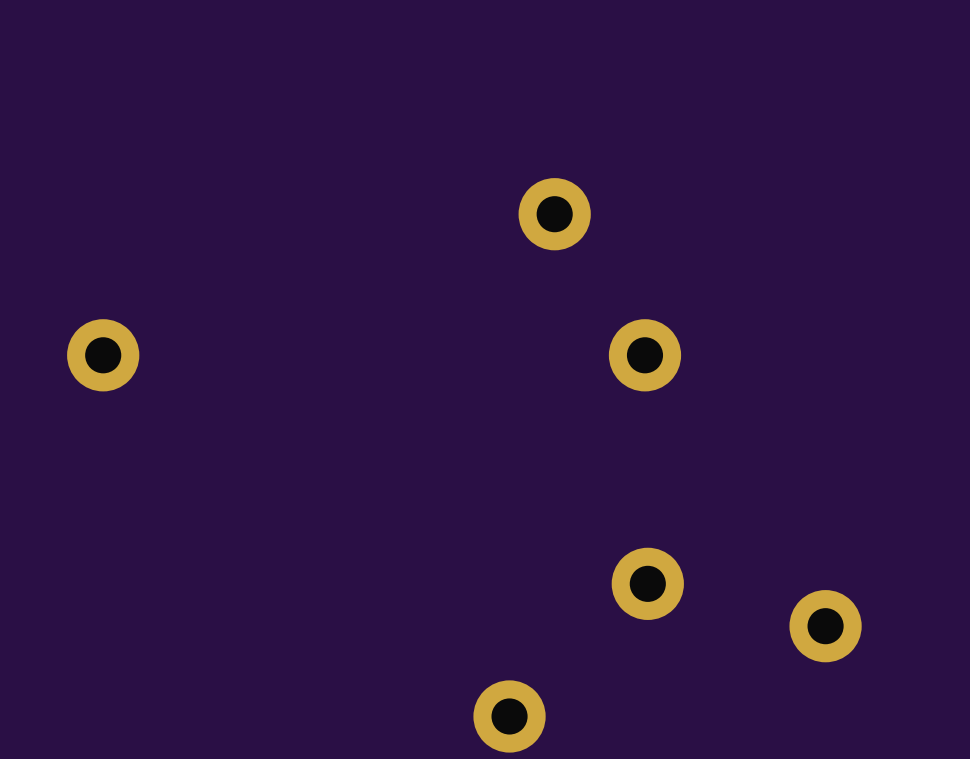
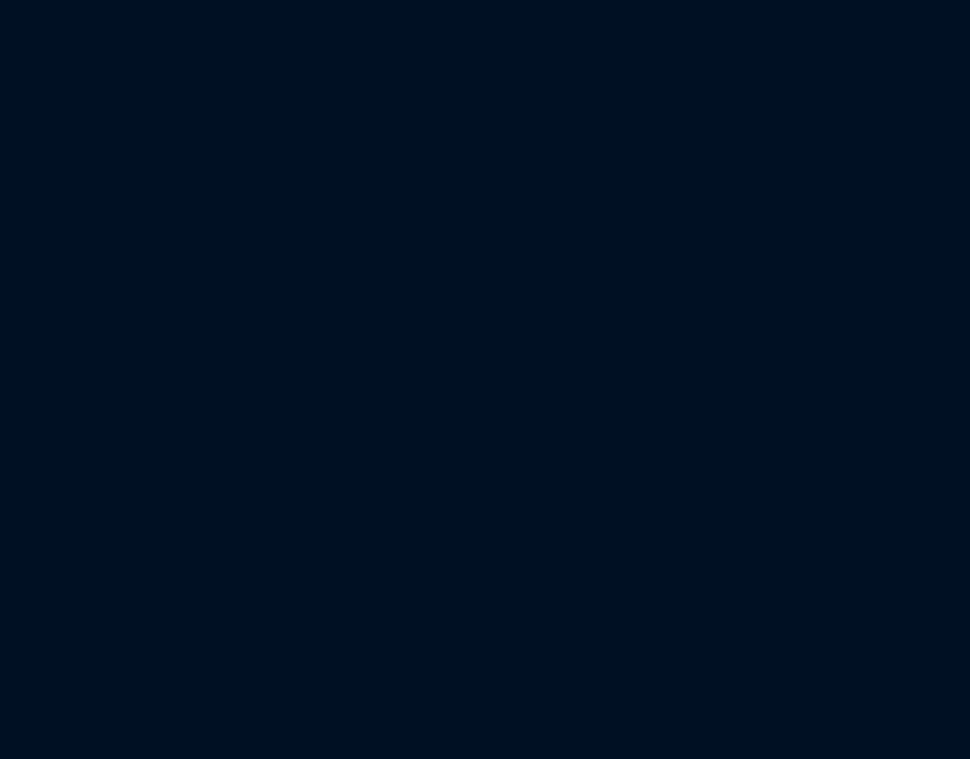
via: (554, 214) -> none
via: (103, 355) -> none
via: (644, 355) -> none
via: (647, 583) -> none
via: (825, 626) -> none
via: (509, 716) -> none

